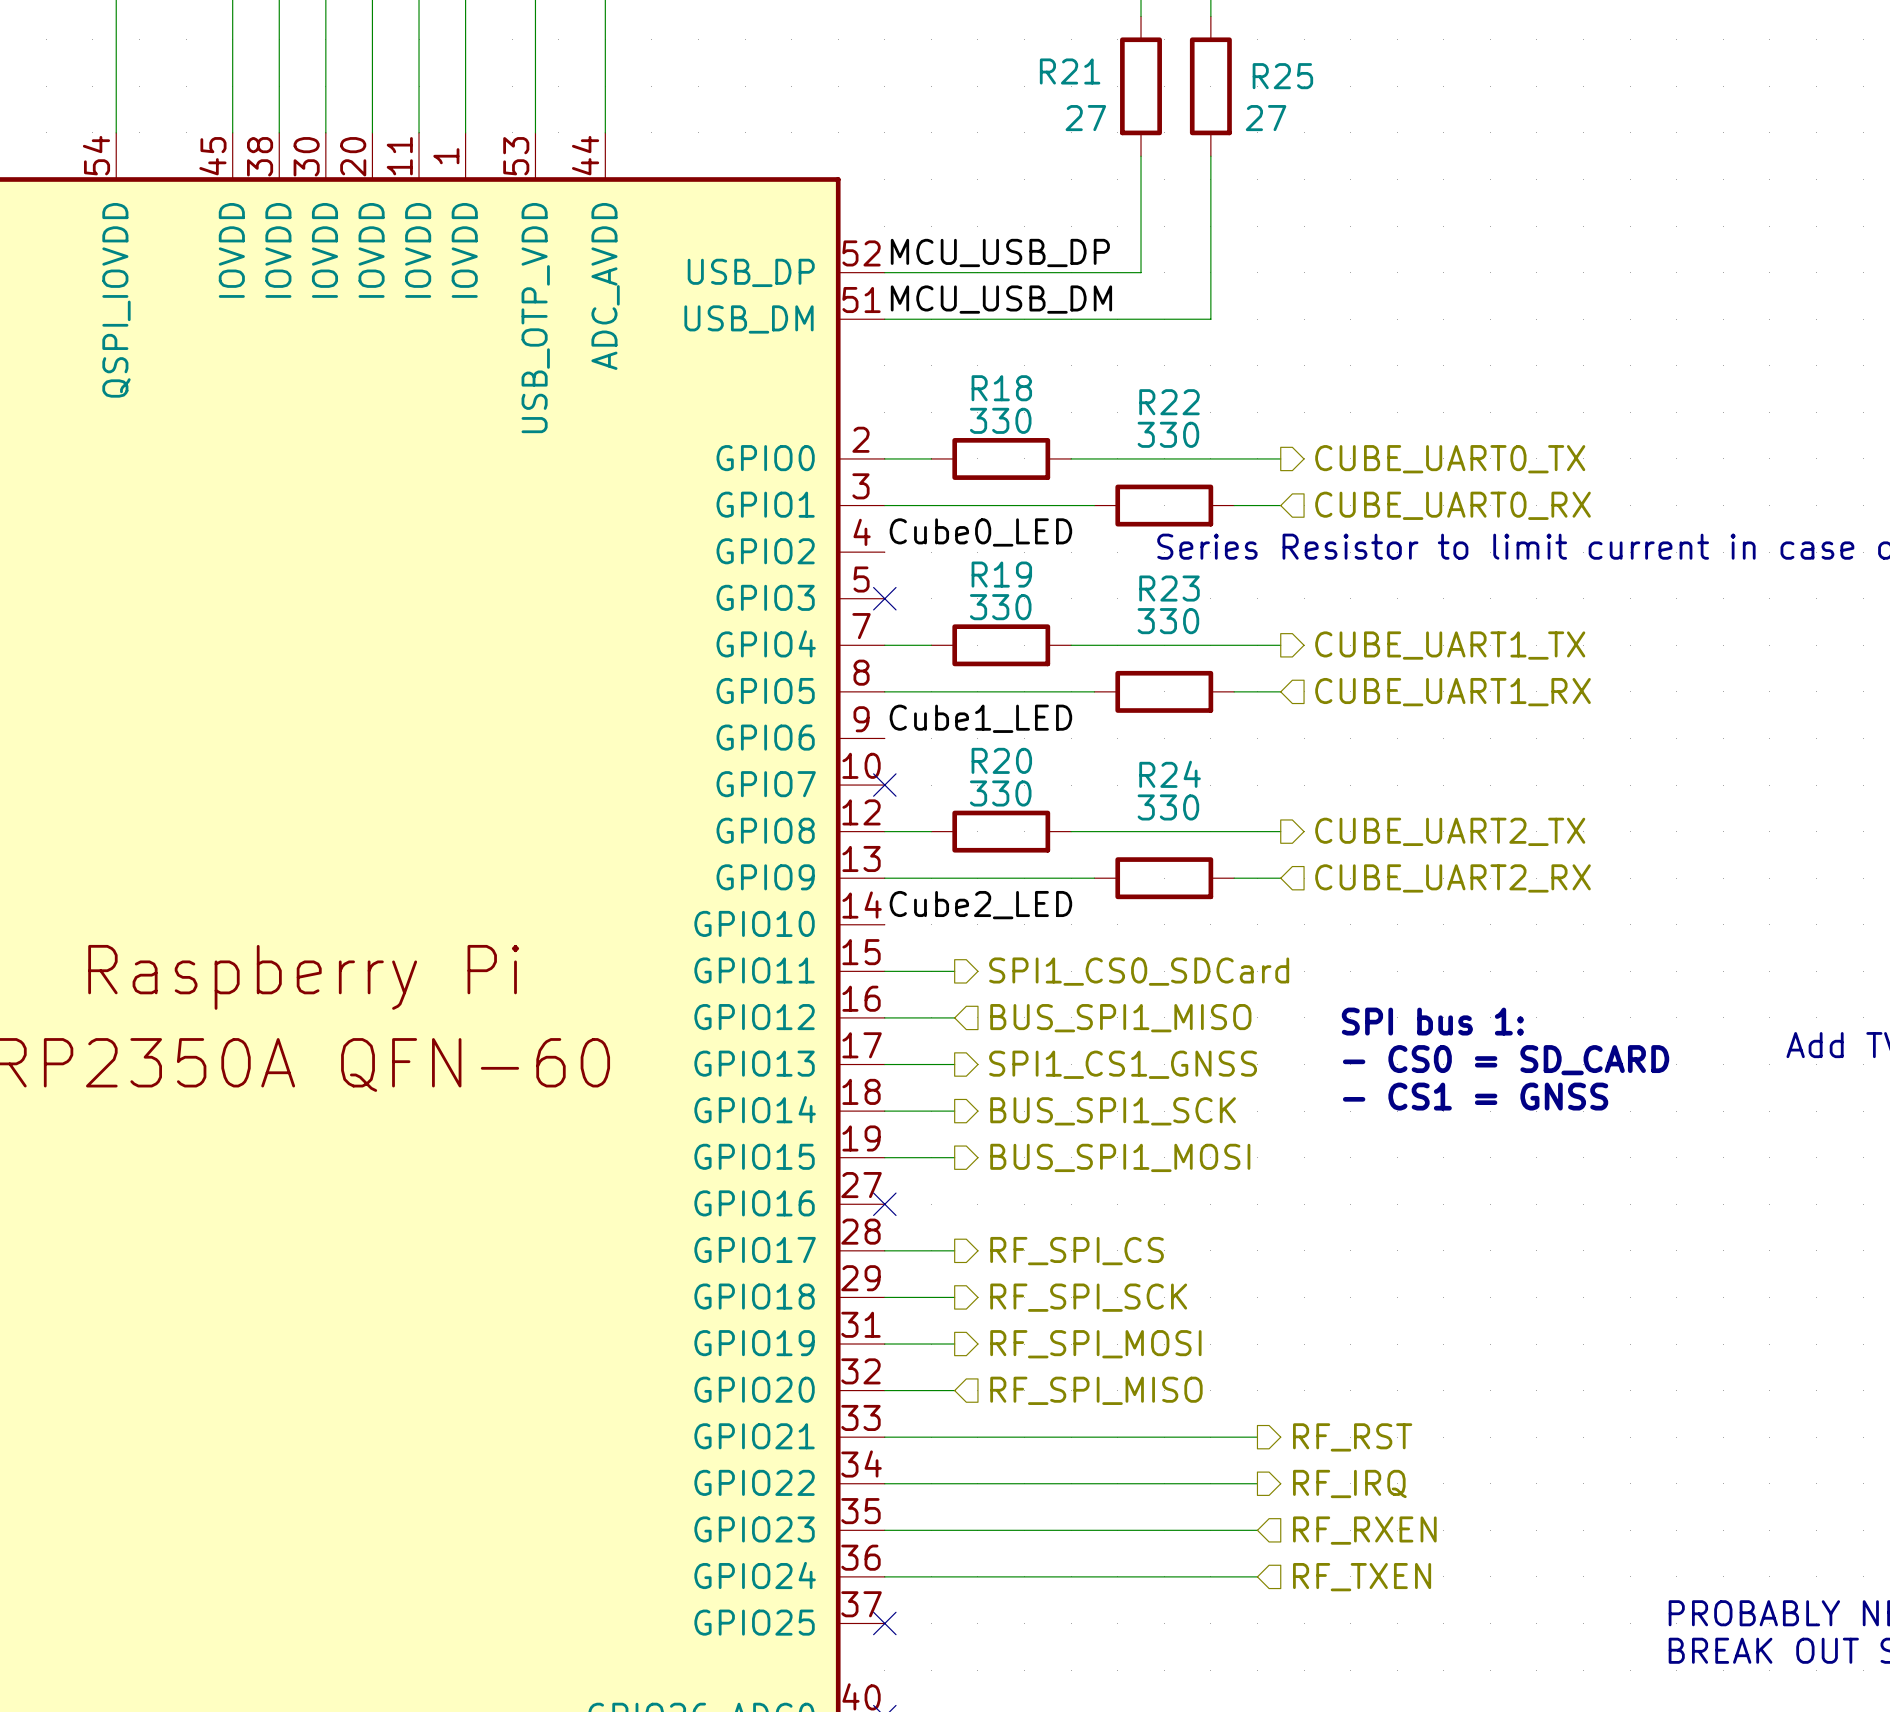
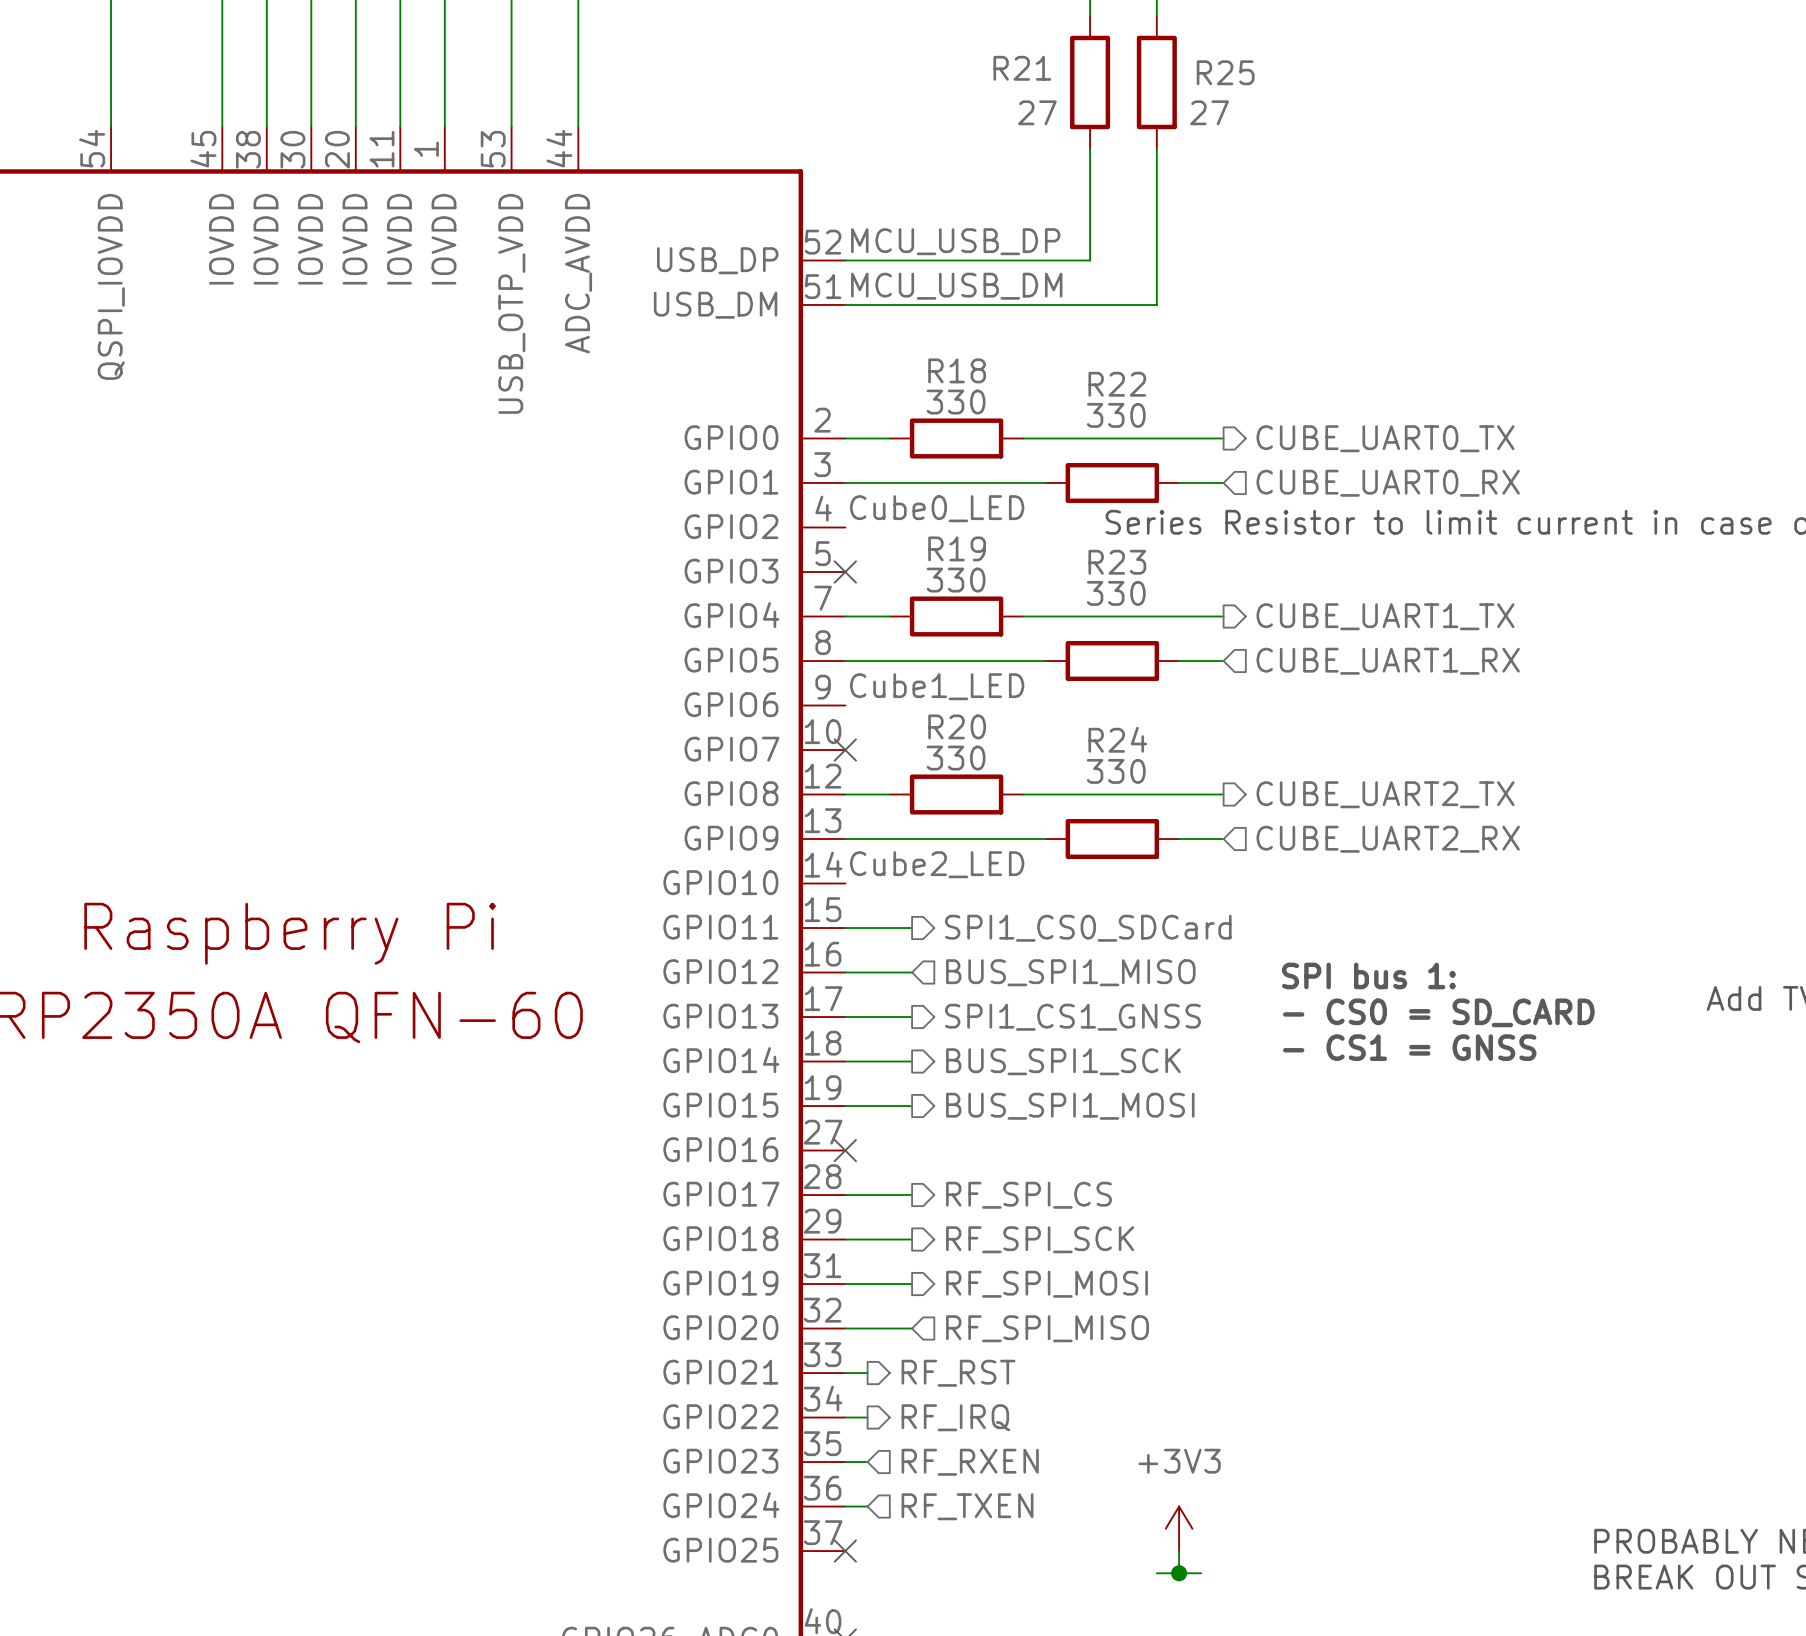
wire: (908, 1437) (1257, 1437) -> none
hierarchical label position: RF_RST (1352, 1437) -> RF_RST (958, 1373)
wire: (908, 1483) (1257, 1483) -> none
hierarchical label position: RF_IRQ (1349, 1483) -> RF_IRQ (955, 1417)
wire: (908, 1530) (1257, 1530) -> none
hierarchical label position: RF_RXEN (1364, 1530) -> RF_RXEN (970, 1462)
wire: (908, 1576) (1257, 1576) -> none
hierarchical label position: RF_TXEN (1362, 1577) -> RF_TXEN (967, 1506)
power symbol: none -> +3V3 (1179, 1528)
wire: none -> (1179, 1551) (1179, 1573)
wire: none -> (1156, 1573) (1201, 1573)
junction: none -> (1179, 1573)

